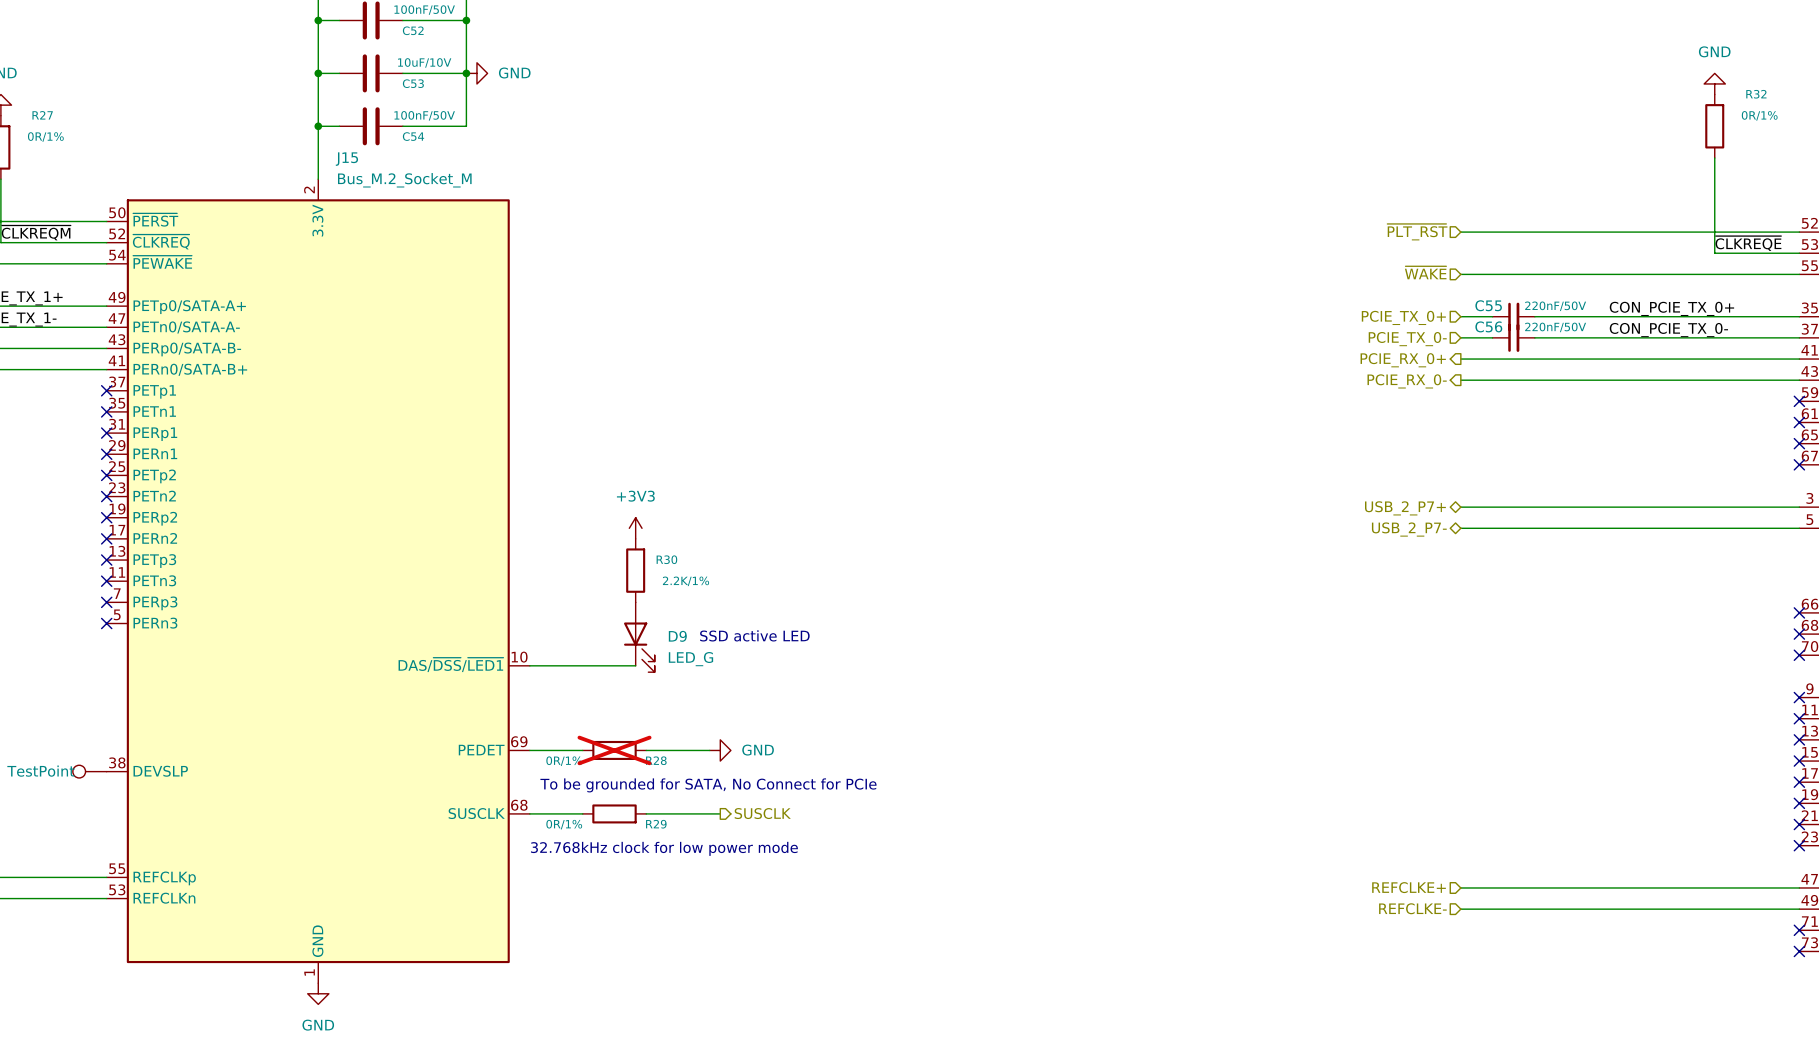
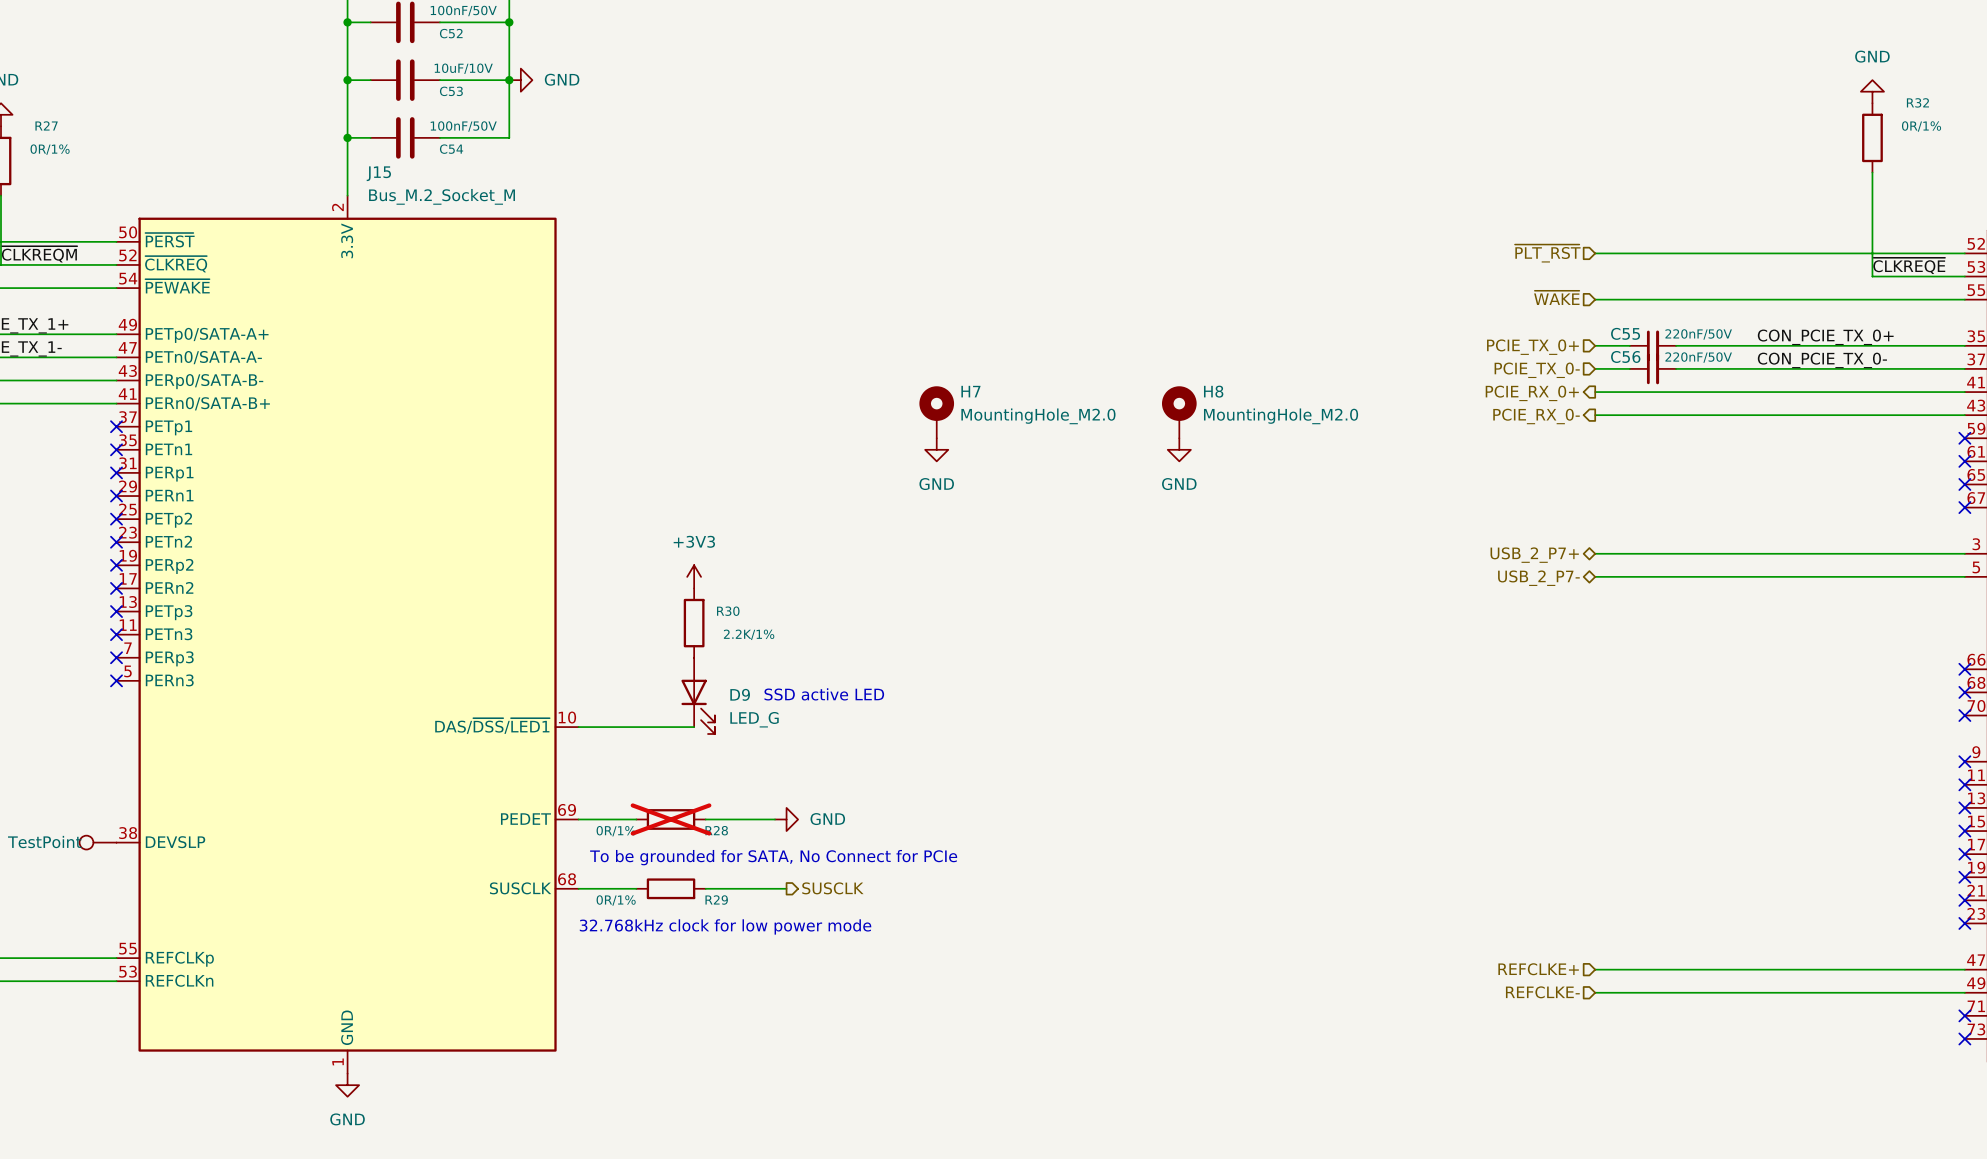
H7: none -> MountingHole_M2.0 (936, 412)
H8: none -> MountingHole_M2.0 (1179, 412)
power symbol: none -> GND (936, 449)
power symbol: none -> GND (1179, 449)

